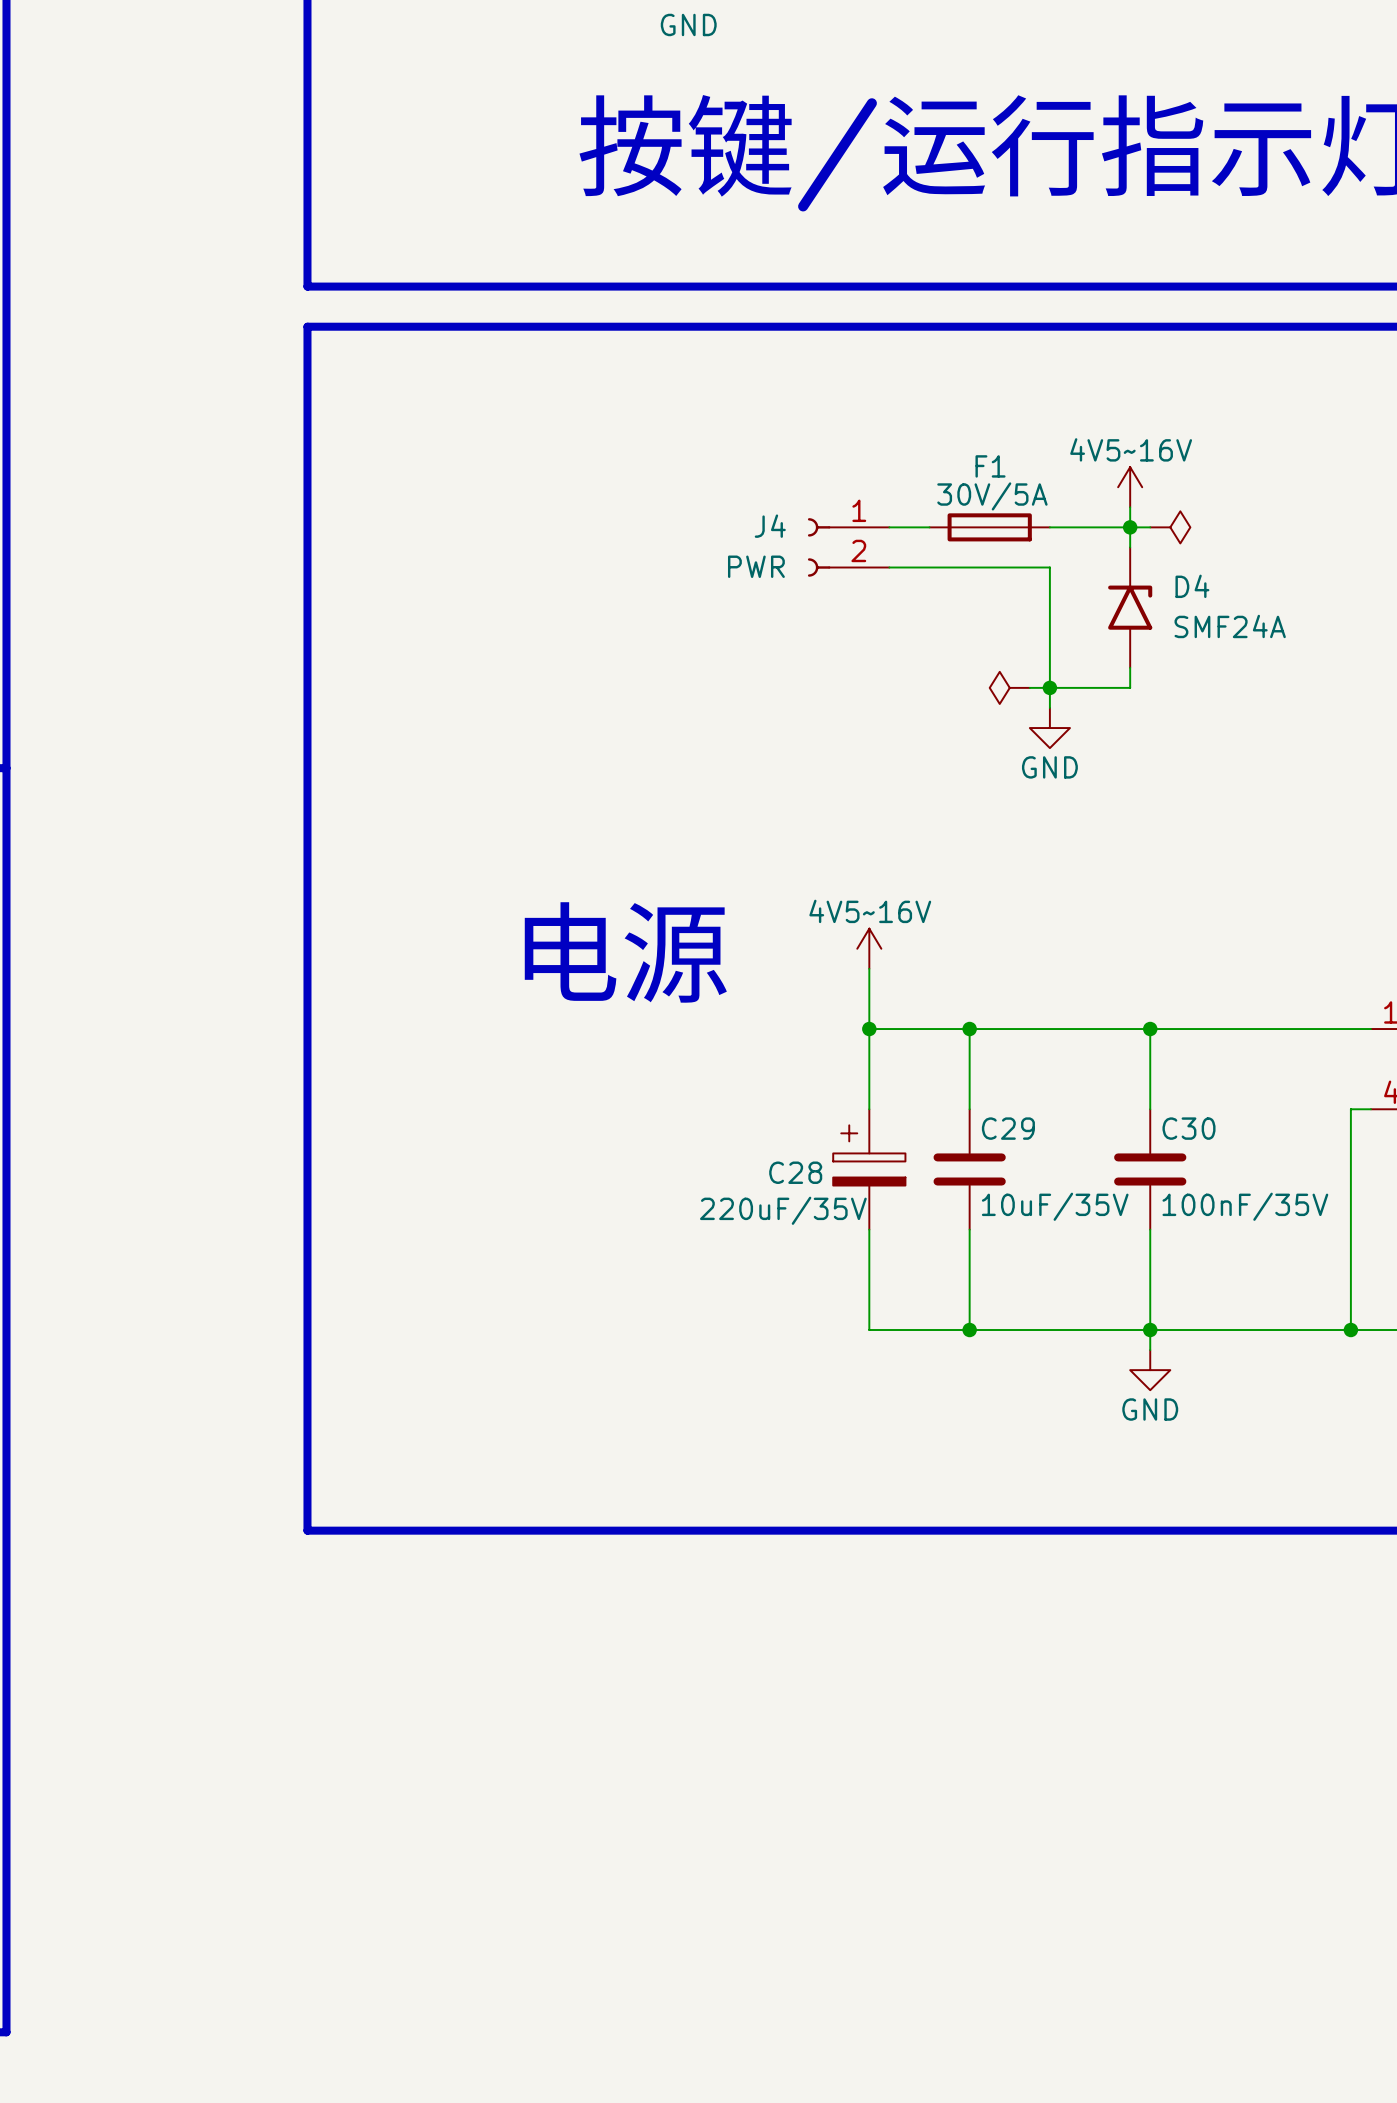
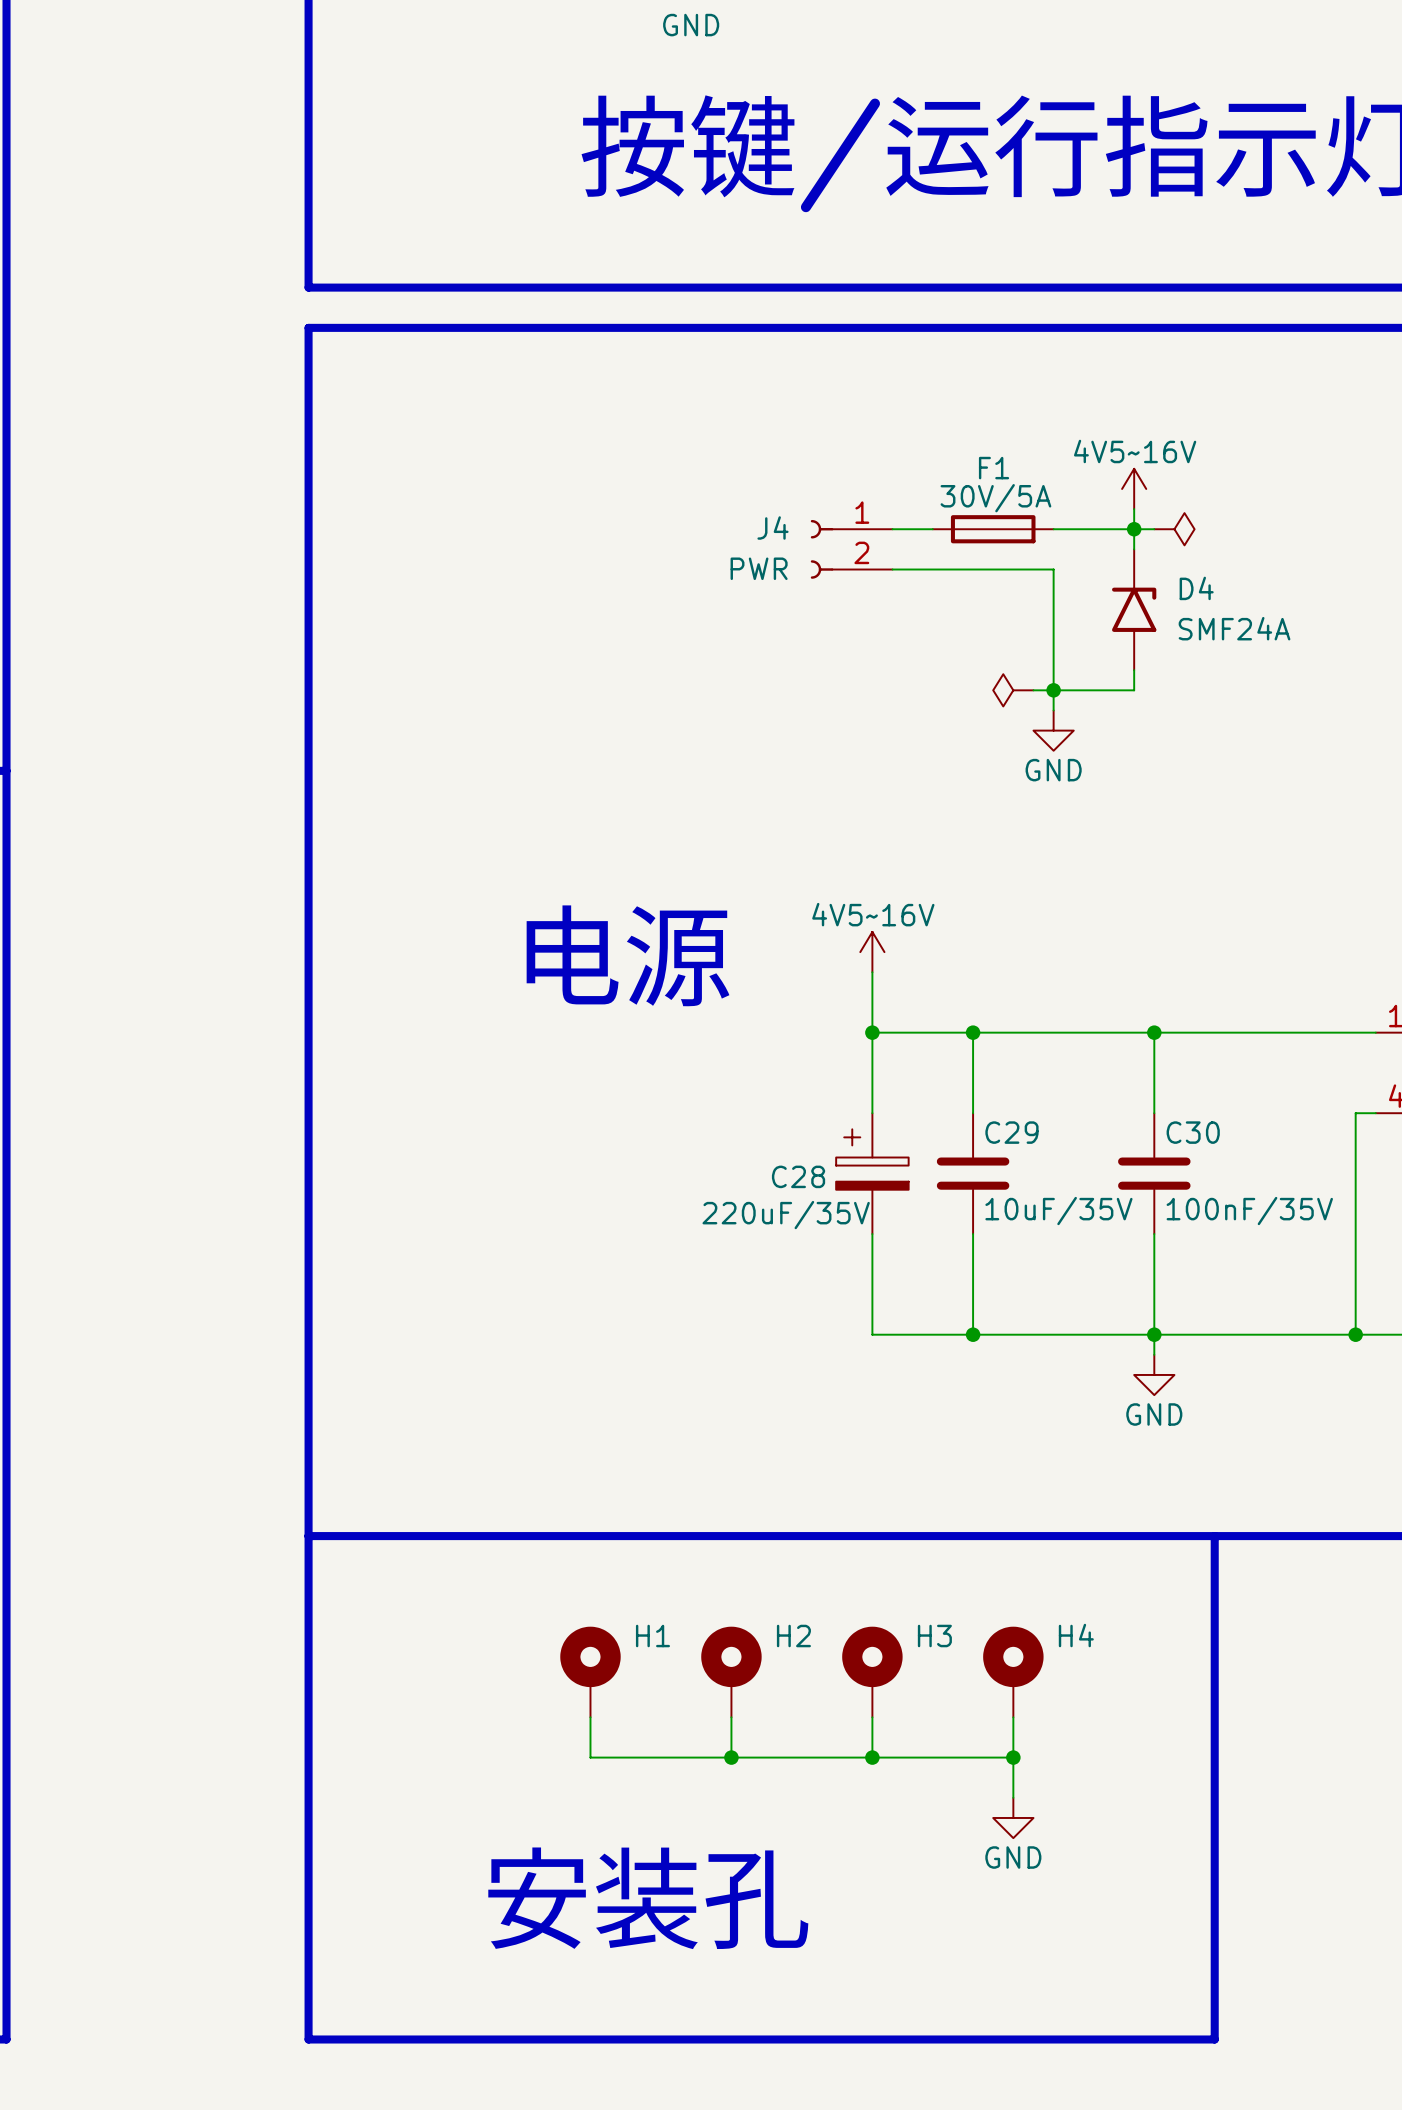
line: none -> (308, 1536) (308, 2039) (1214, 2039) (1214, 1536)
H1: none -> (590, 1671)
H2: none -> (731, 1671)
H3: none -> (872, 1671)
H4: none -> (1013, 1671)
wire: none -> (590, 1717) (590, 1757) (1013, 1757)
wire: none -> (731, 1717) (731, 1757)
wire: none -> (872, 1717) (872, 1757)
wire: none -> (1013, 1717) (1013, 1797)
junction: none -> (731, 1757)
junction: none -> (872, 1757)
junction: none -> (1013, 1757)
power symbol: none -> GND (1013, 1817)
text: none -> 安装孔 (648, 1898)

